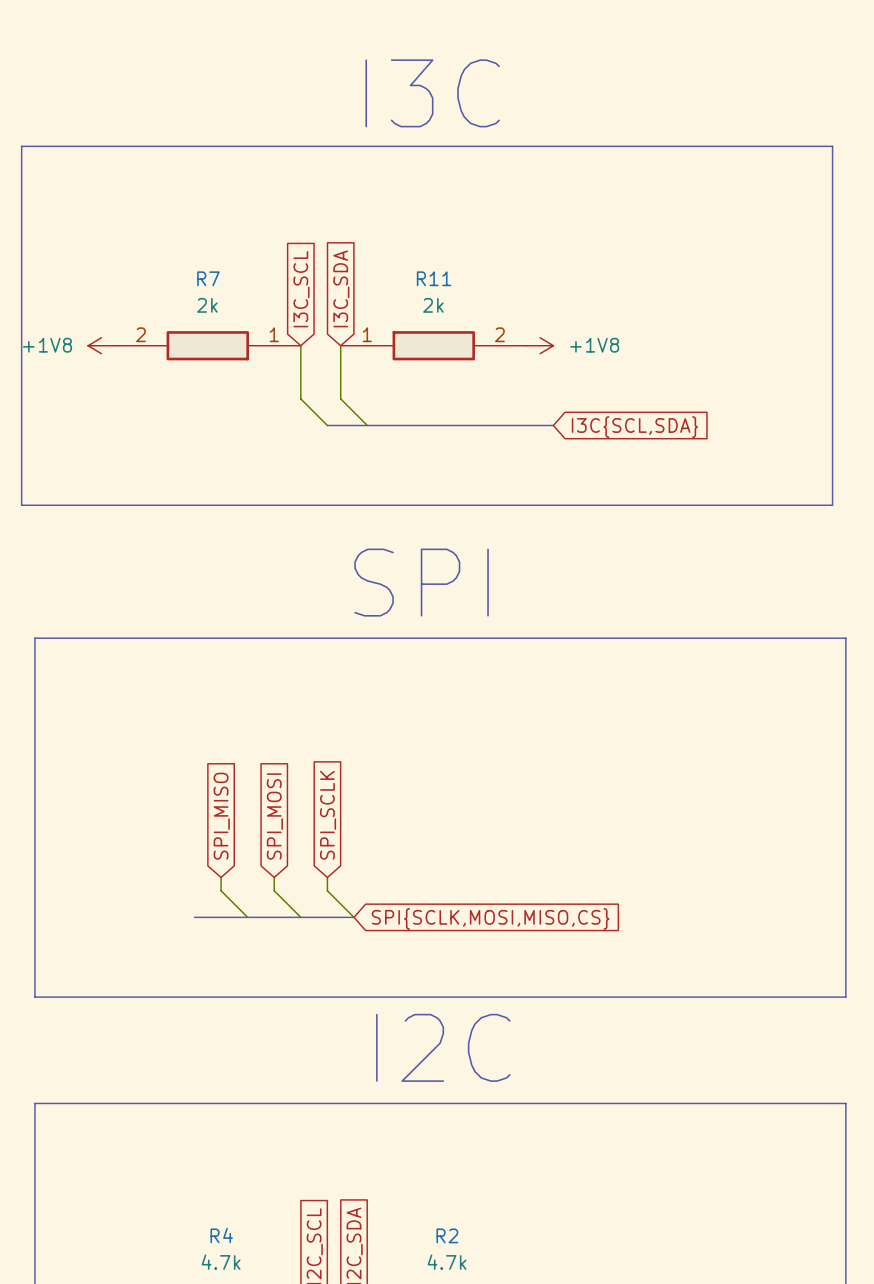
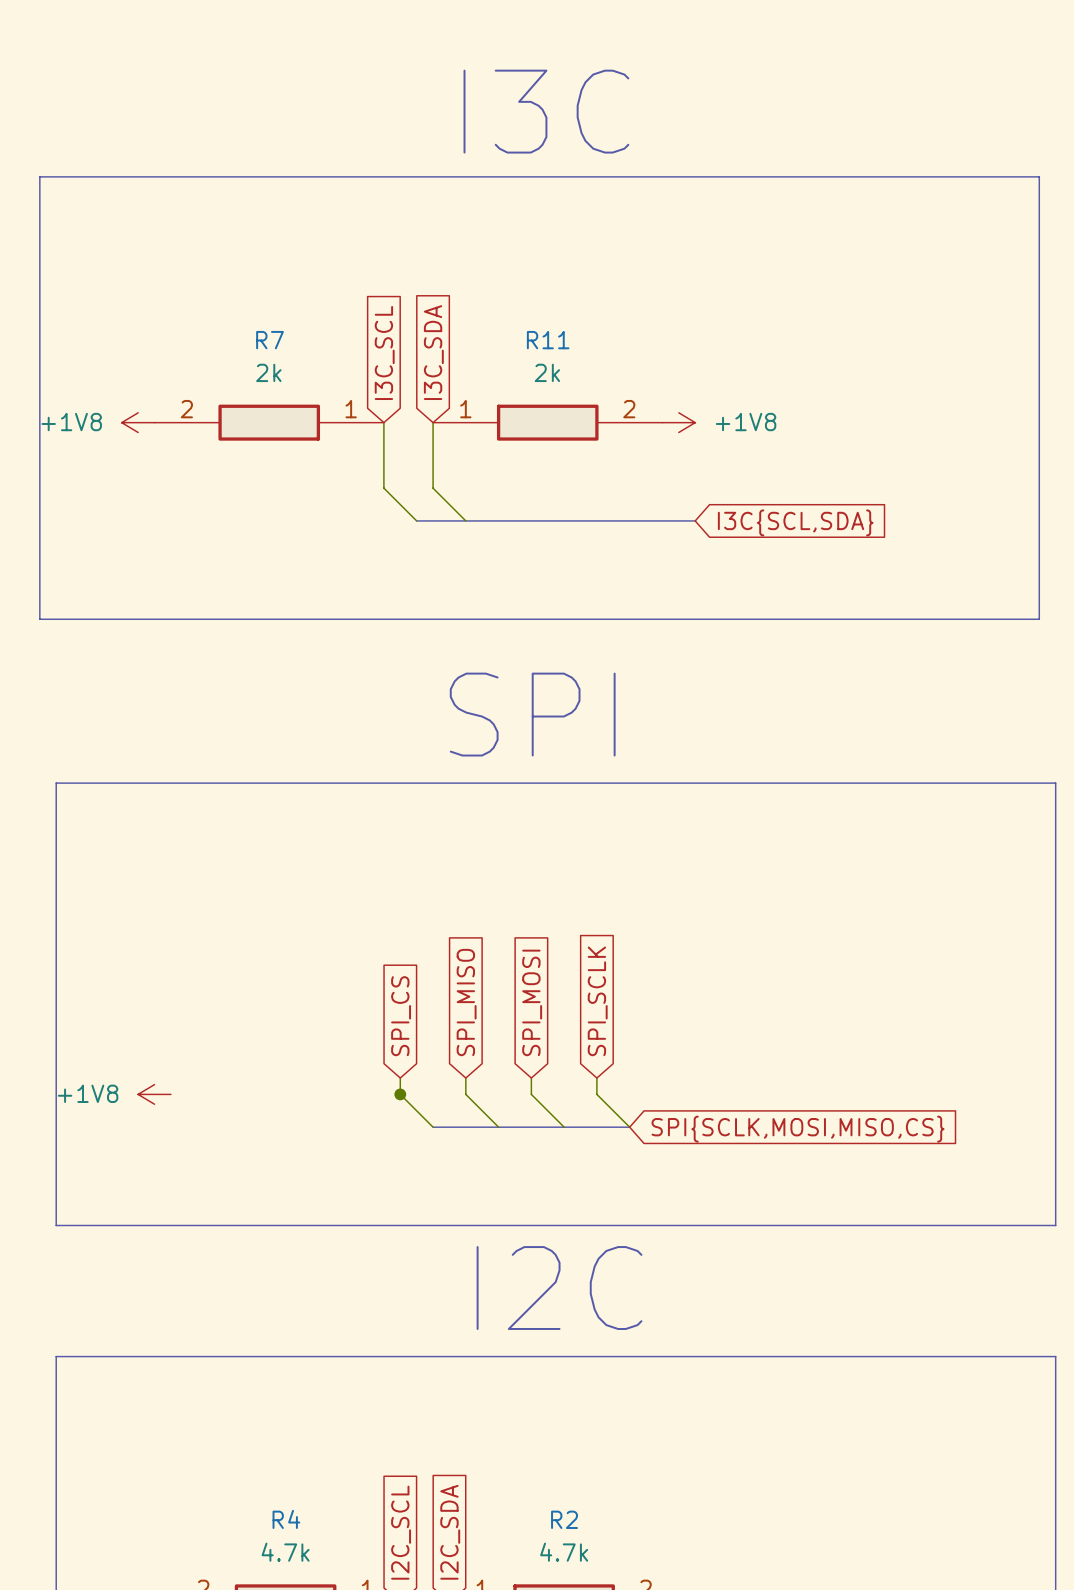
global label position: SPI_SCLK (328, 815) -> SPI_SCLK (597, 1001)
global label position: SPI_MISO (221, 816) -> SPI_MISO (466, 1002)
global label position: SPI_MOSI (274, 816) -> SPI_MOSI (532, 1002)
global label: none -> SPI_CS (401, 1016)
wire: (221, 877) (221, 890) (247, 917) -> (400, 1078) (400, 1094) (433, 1127)
wire: (274, 877) (274, 890) (300, 917) -> (465, 1078) (465, 1094) (498, 1127)
wire: (327, 877) (327, 890) (354, 917) -> (531, 1078) (531, 1094) (564, 1127)
wire: none -> (596, 1078) (596, 1094) (629, 1127)
power symbol: none -> +1V8 (154, 1094)
junction: none -> (400, 1094)
bus: (194, 917) (340, 917) -> (449, 1127) (629, 1127)
global label position: SPI{SCLK,MOSI,MISO,CS} (490, 918) -> SPI{SCLK,MOSI,MISO,CS} (798, 1129)

